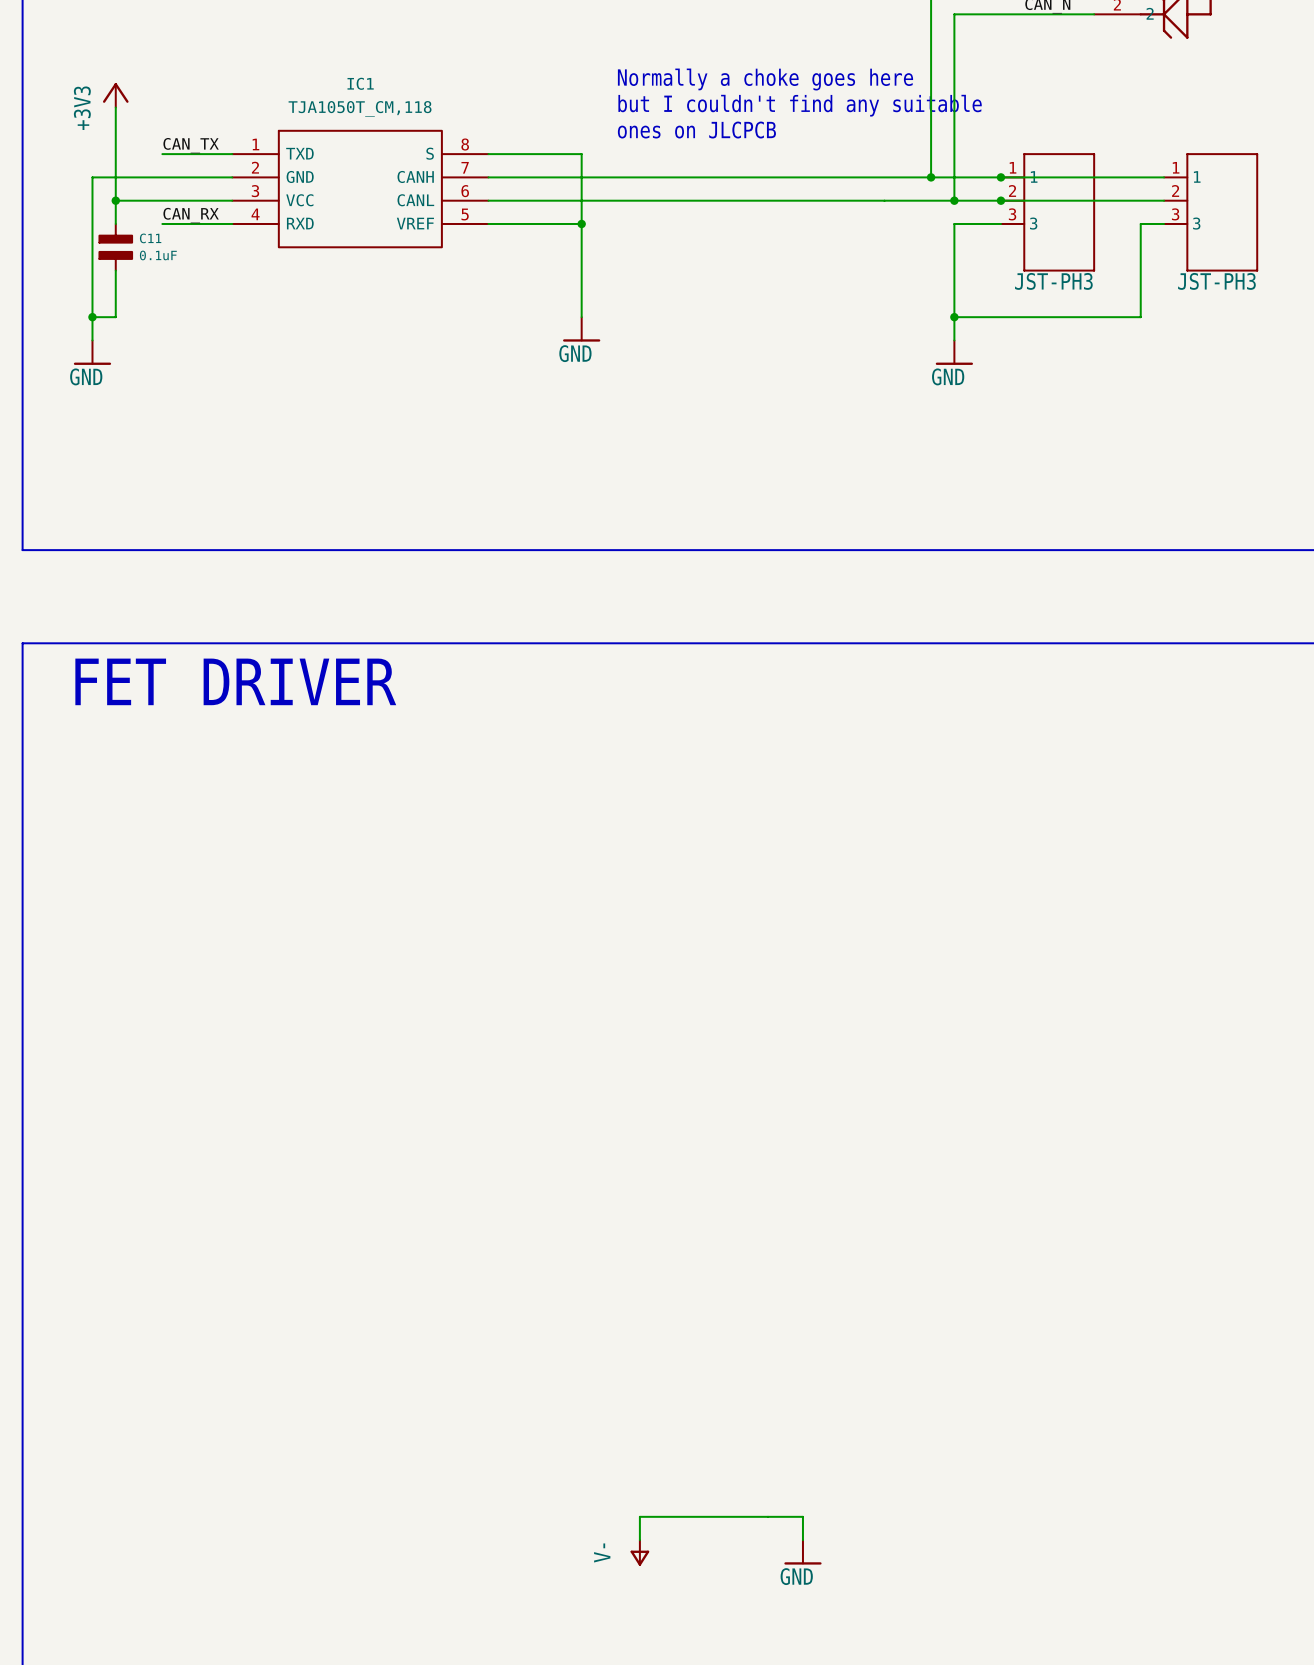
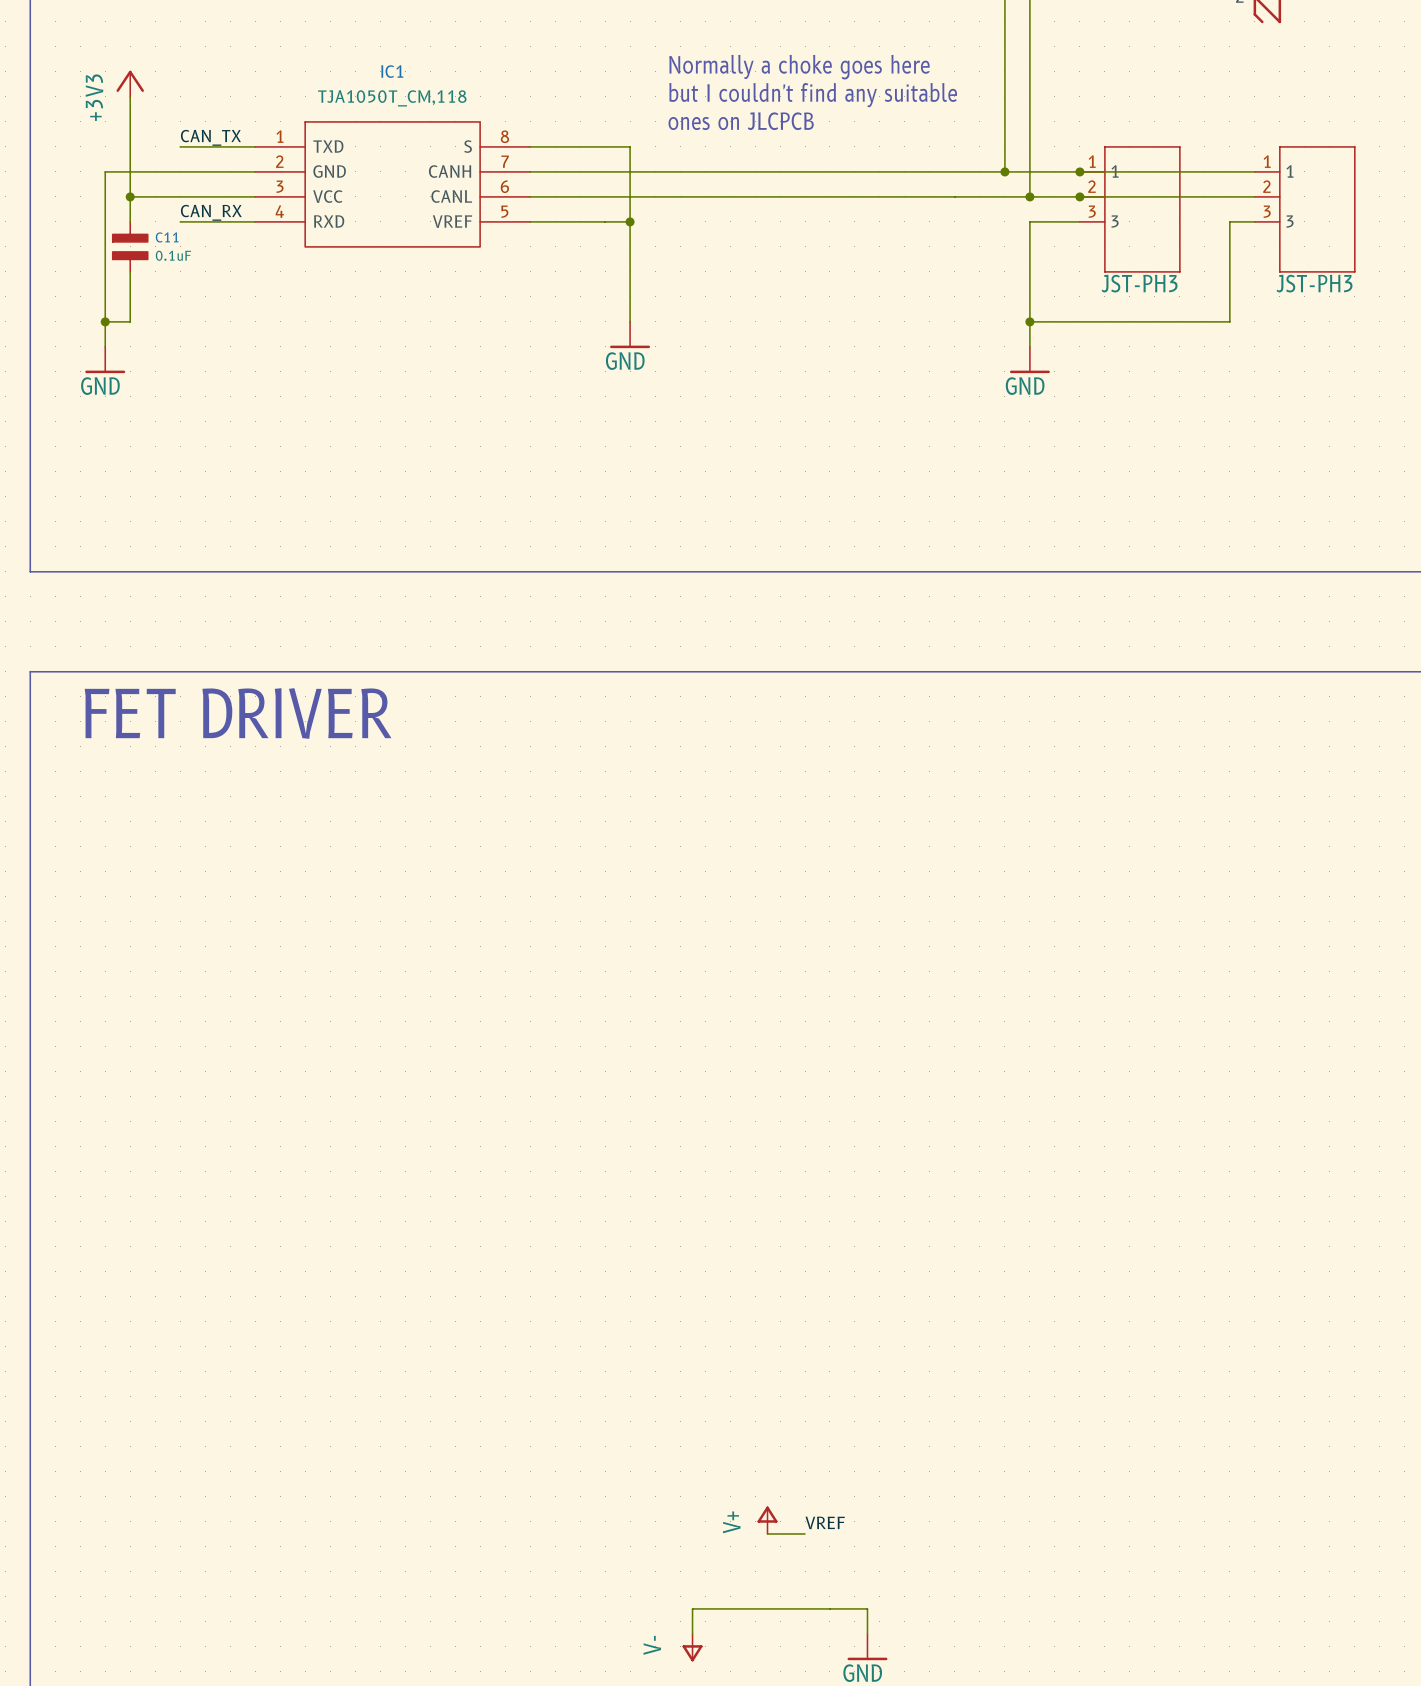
power symbol: none -> V+ (767, 1520)
label: none -> VREF (825, 1522)
wire: none -> (767, 1533) (805, 1533)

